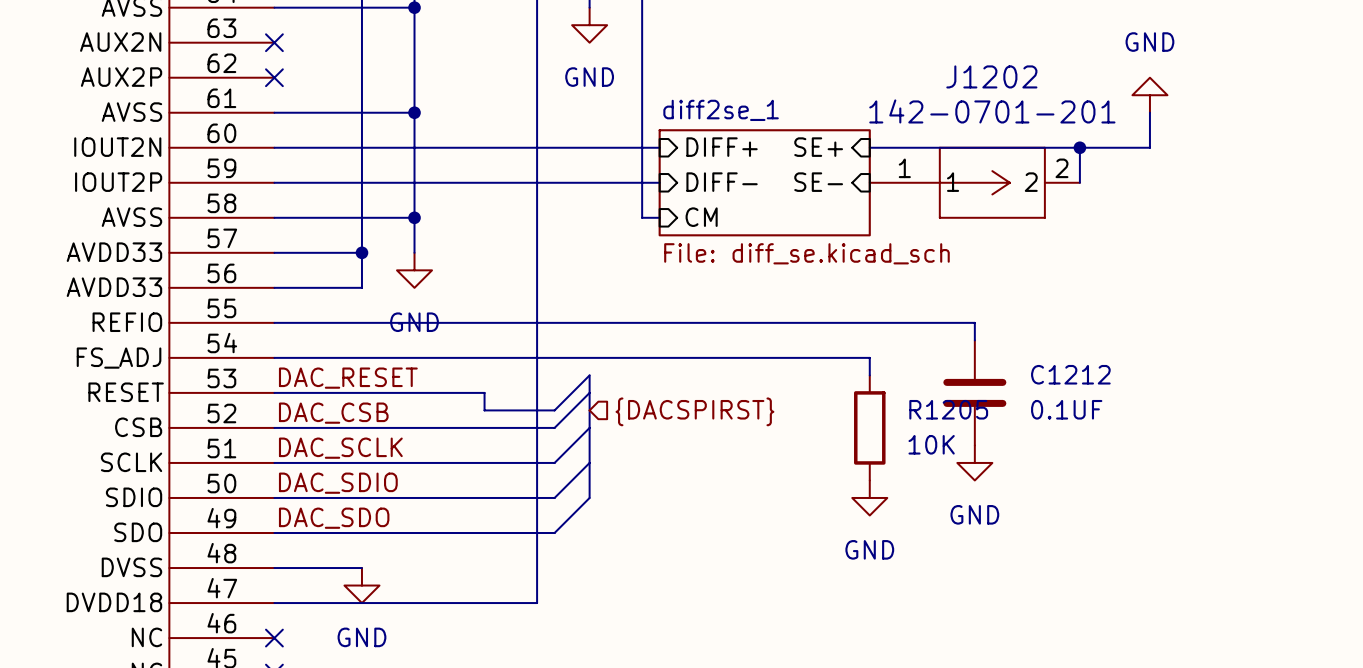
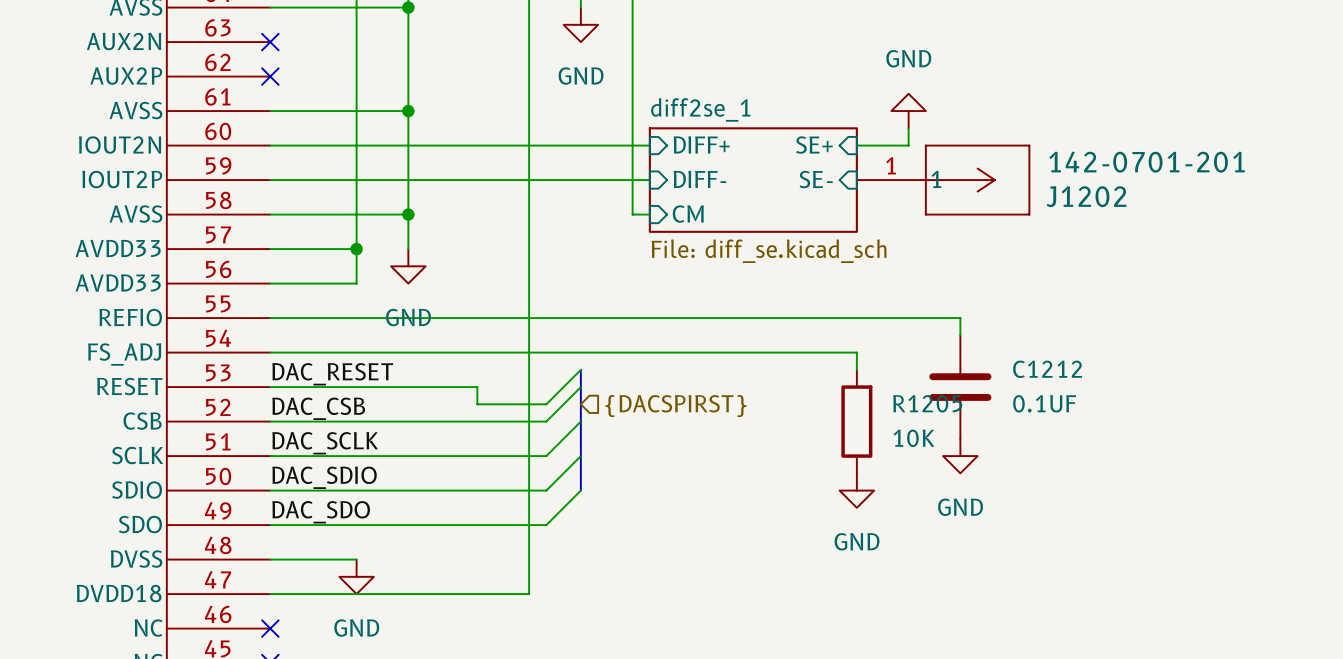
J1202 name position: J1202 (991, 76) -> J1202 (1086, 196)
power symbol position: GND (1149, 95) -> GND (908, 111)
J1202 value position: 142-0701-201 (992, 111) -> 142-0701-201 (1147, 162)
wire: (1149, 112) (1149, 147) (922, 147) -> (908, 128) (908, 145)
J1202 symbol: [869, 146, 1080, 219] -> [856, 144, 1031, 216]
wire: (1079, 147) (1079, 182) -> none
junction: (1079, 147) -> none

